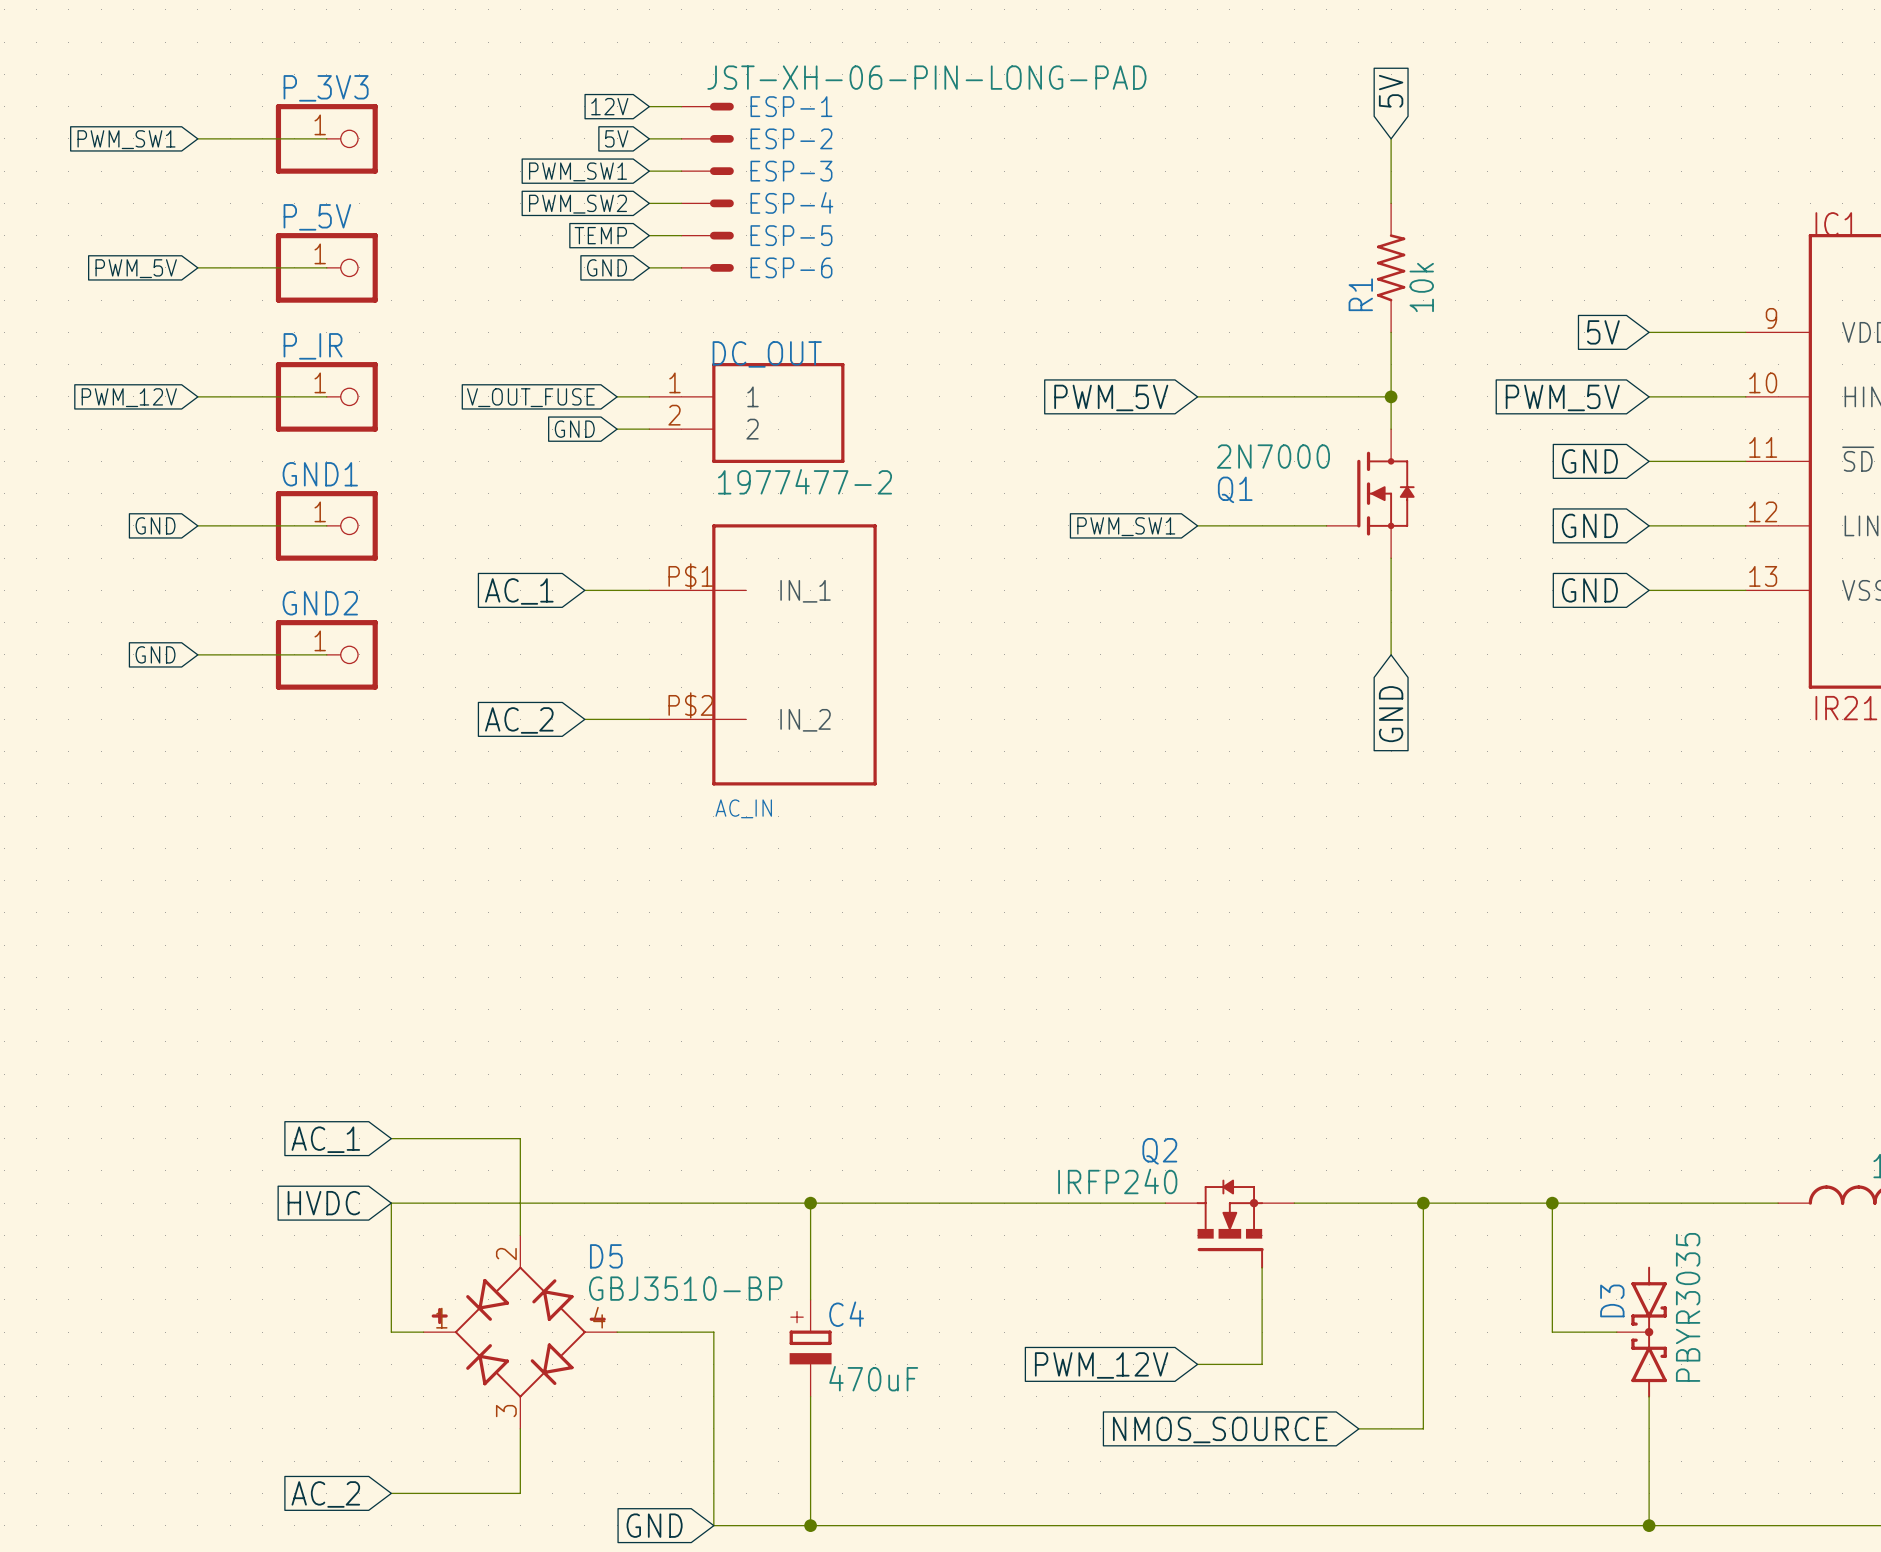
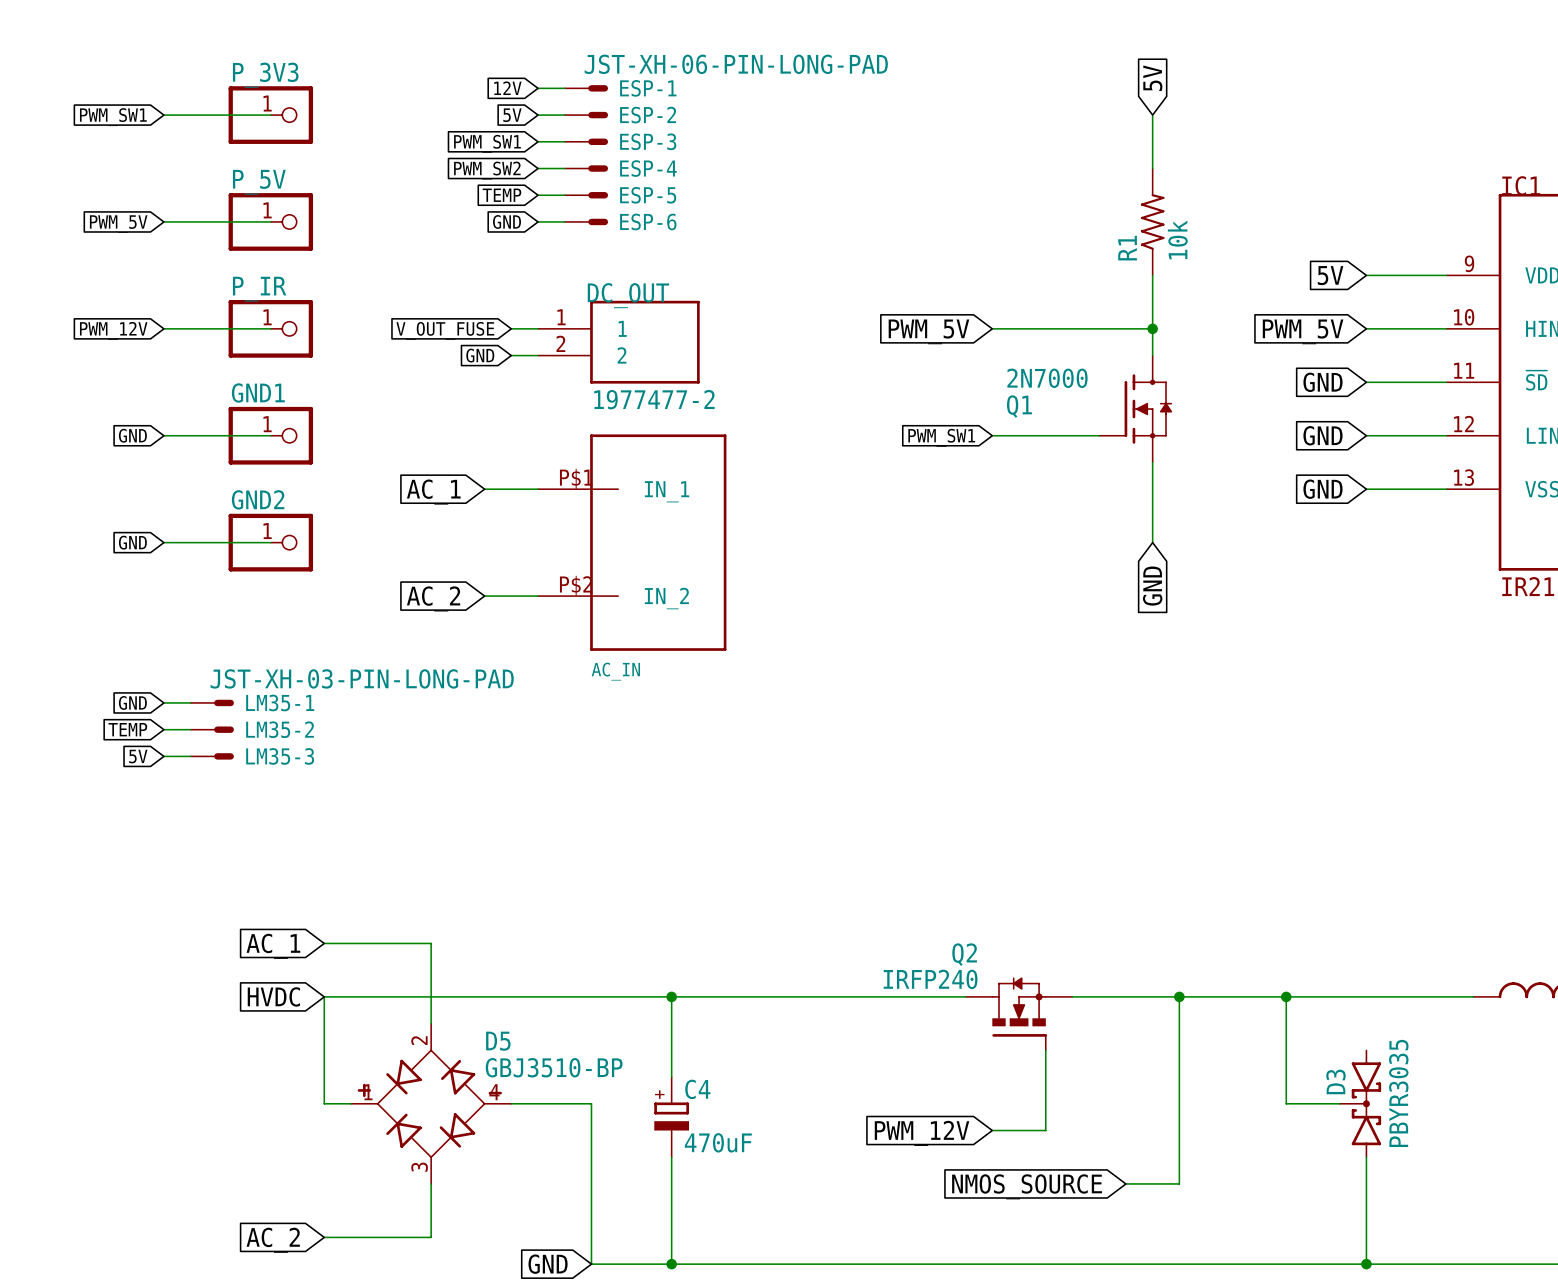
global label: none -> GND (132, 702)
wire: none -> (163, 702) (190, 702)
LM35-1: none -> JST-XH-03-PIN-LONG-PAD (212, 702)
global label: none -> TEMP (127, 729)
wire: none -> (163, 729) (190, 729)
LM35-2: none -> (212, 729)
global label: none -> 5V (138, 756)
wire: none -> (163, 756) (190, 756)
LM35-3: none -> (212, 756)

